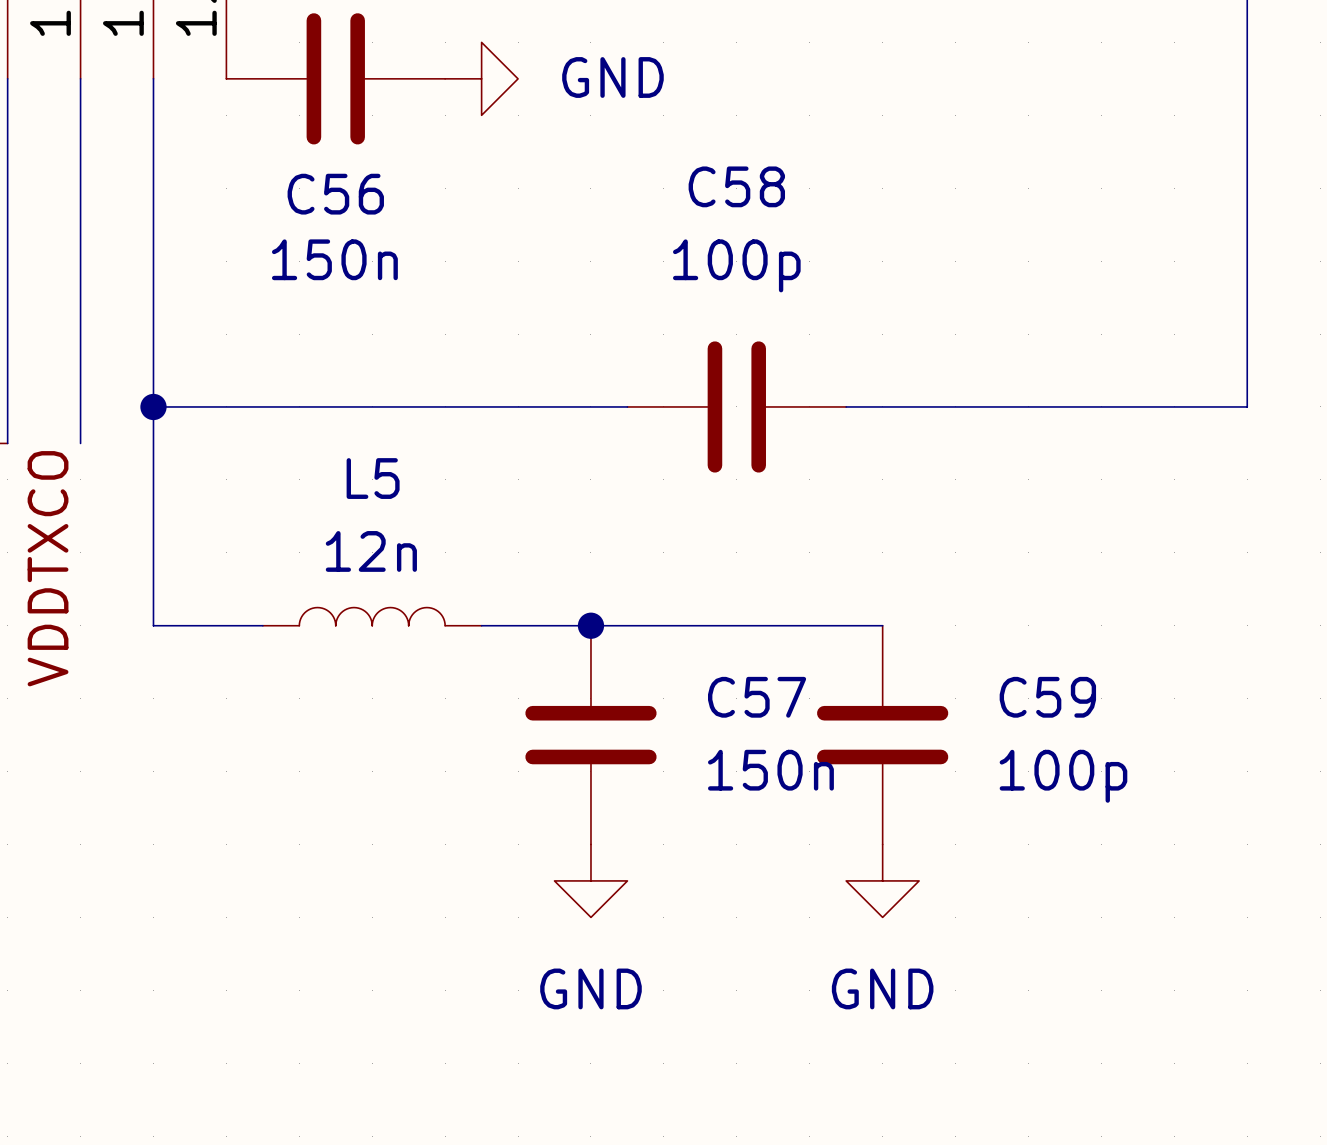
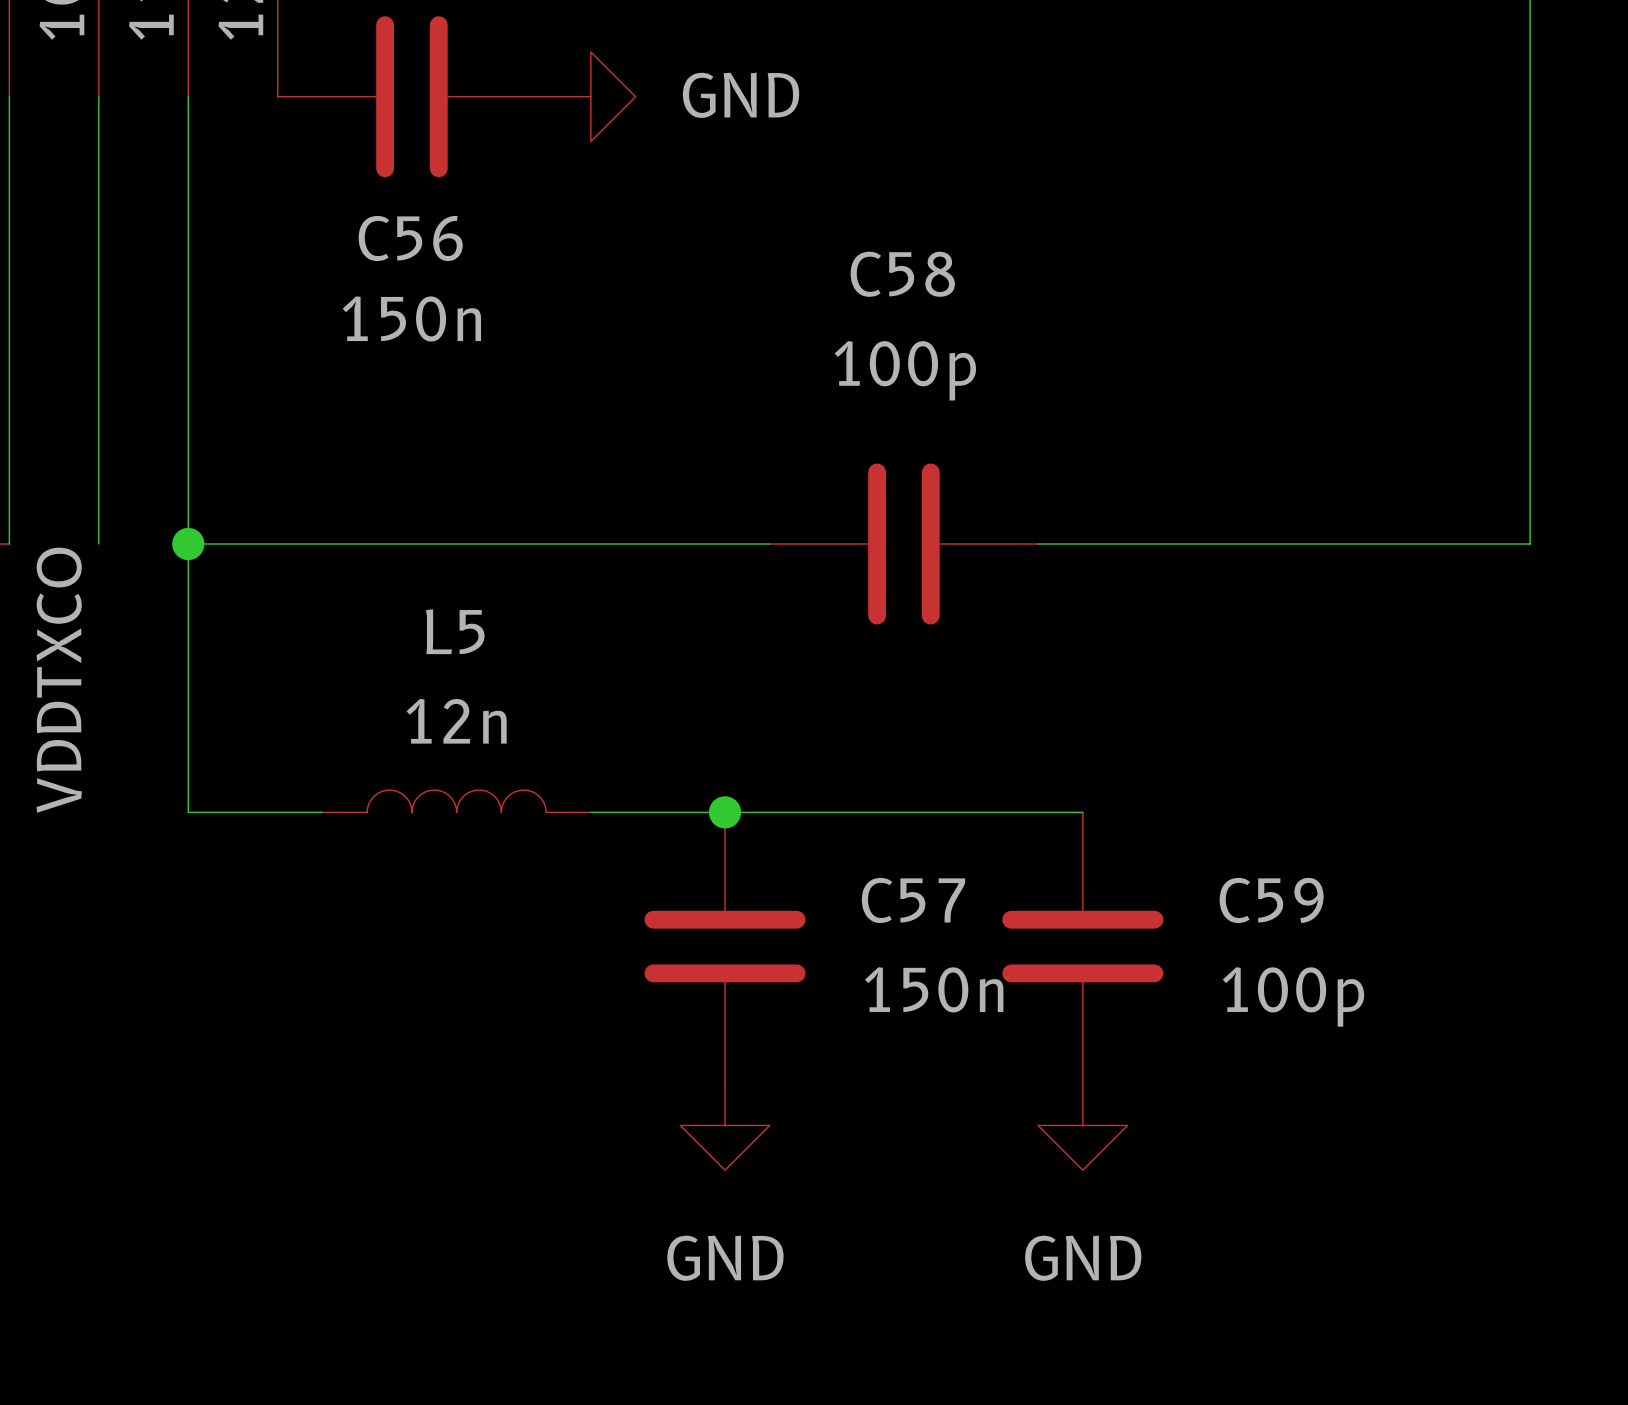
wire: (153, 406) (627, 406) -> (188, 544) (769, 544)
junction position: (153, 406) -> (188, 544)
C58 position: (736, 406) -> (903, 544)
wire: (846, 406) (1247, 406) -> (1038, 544) (1530, 544) (1530, 499)
L5 position: (372, 616) -> (456, 801)
wire: (153, 625) (262, 625) -> (188, 767) (188, 812) (322, 812)
wire: (481, 625) (882, 625) -> (590, 812) (1082, 812)
junction position: (590, 625) -> (725, 812)
C57 position: (590, 735) -> (725, 946)
C59 position: (882, 735) -> (1082, 946)
power symbol position: GND (590, 880) -> GND (725, 1125)
power symbol position: GND (882, 880) -> GND (1082, 1125)

